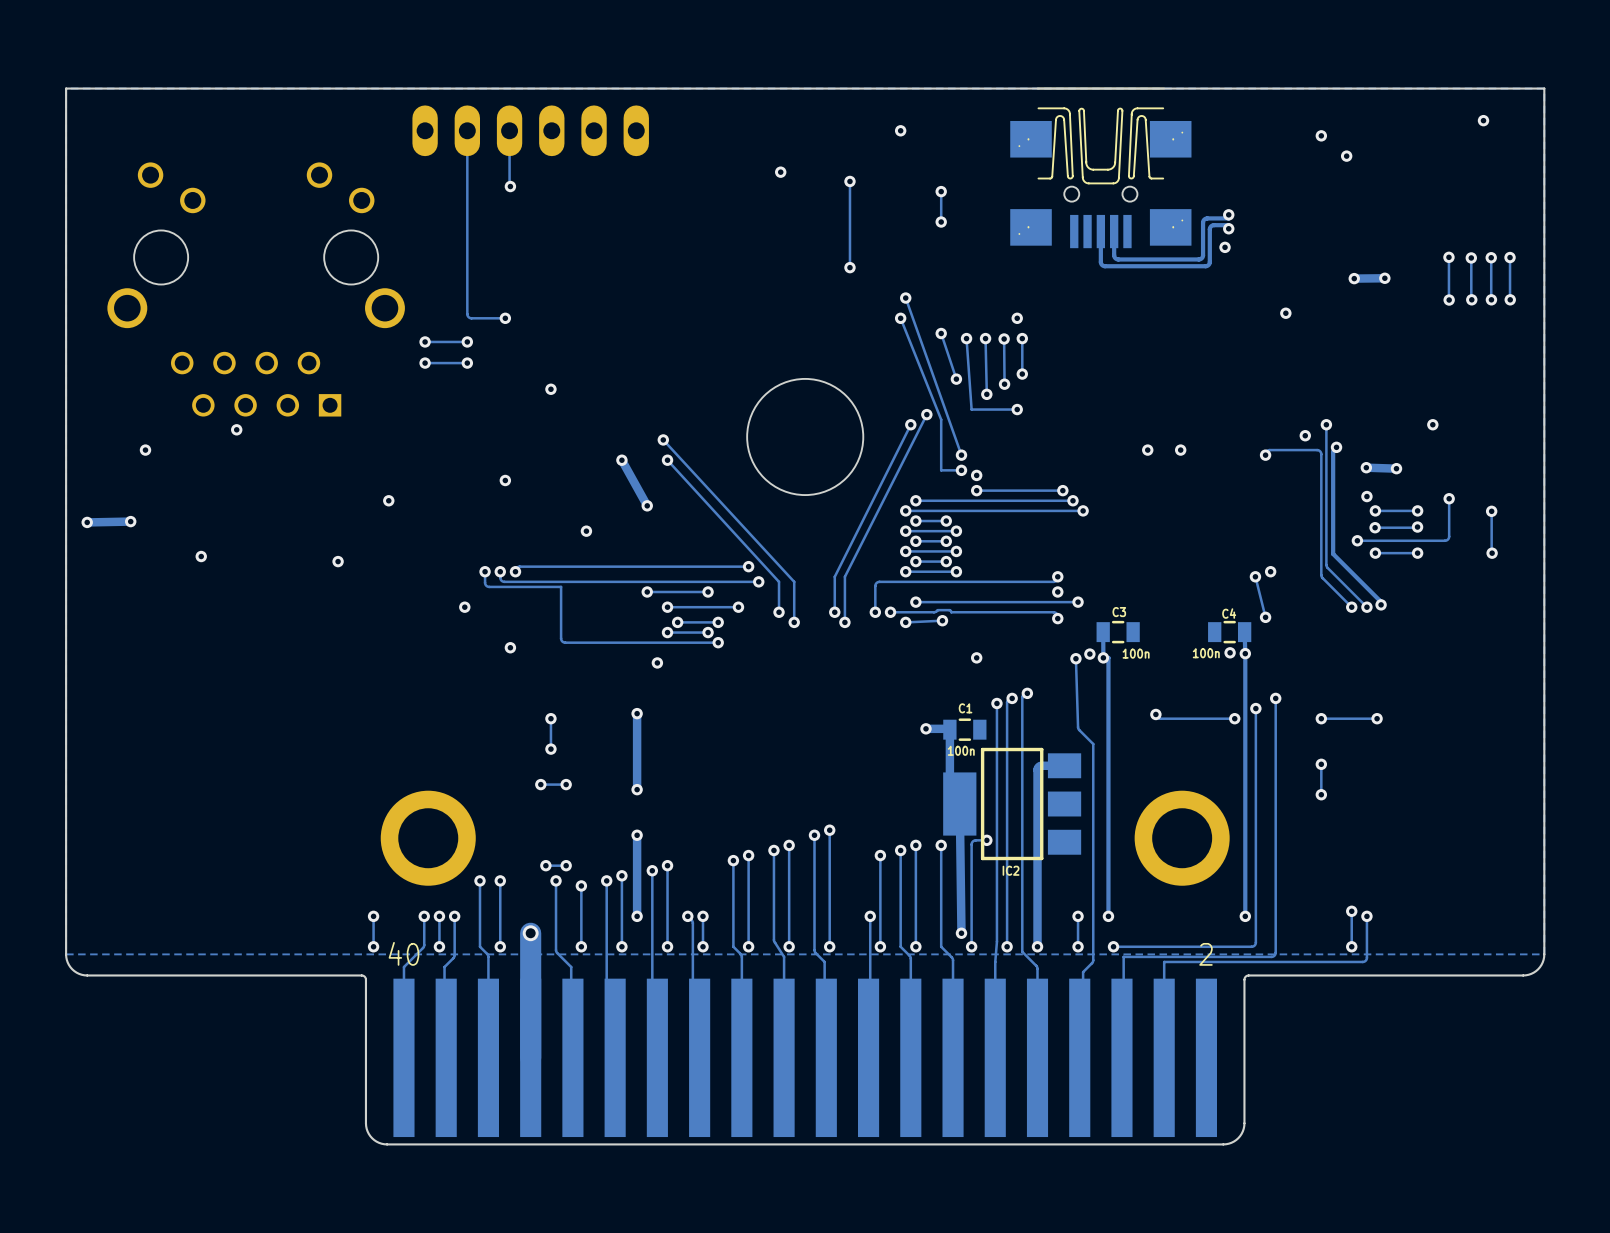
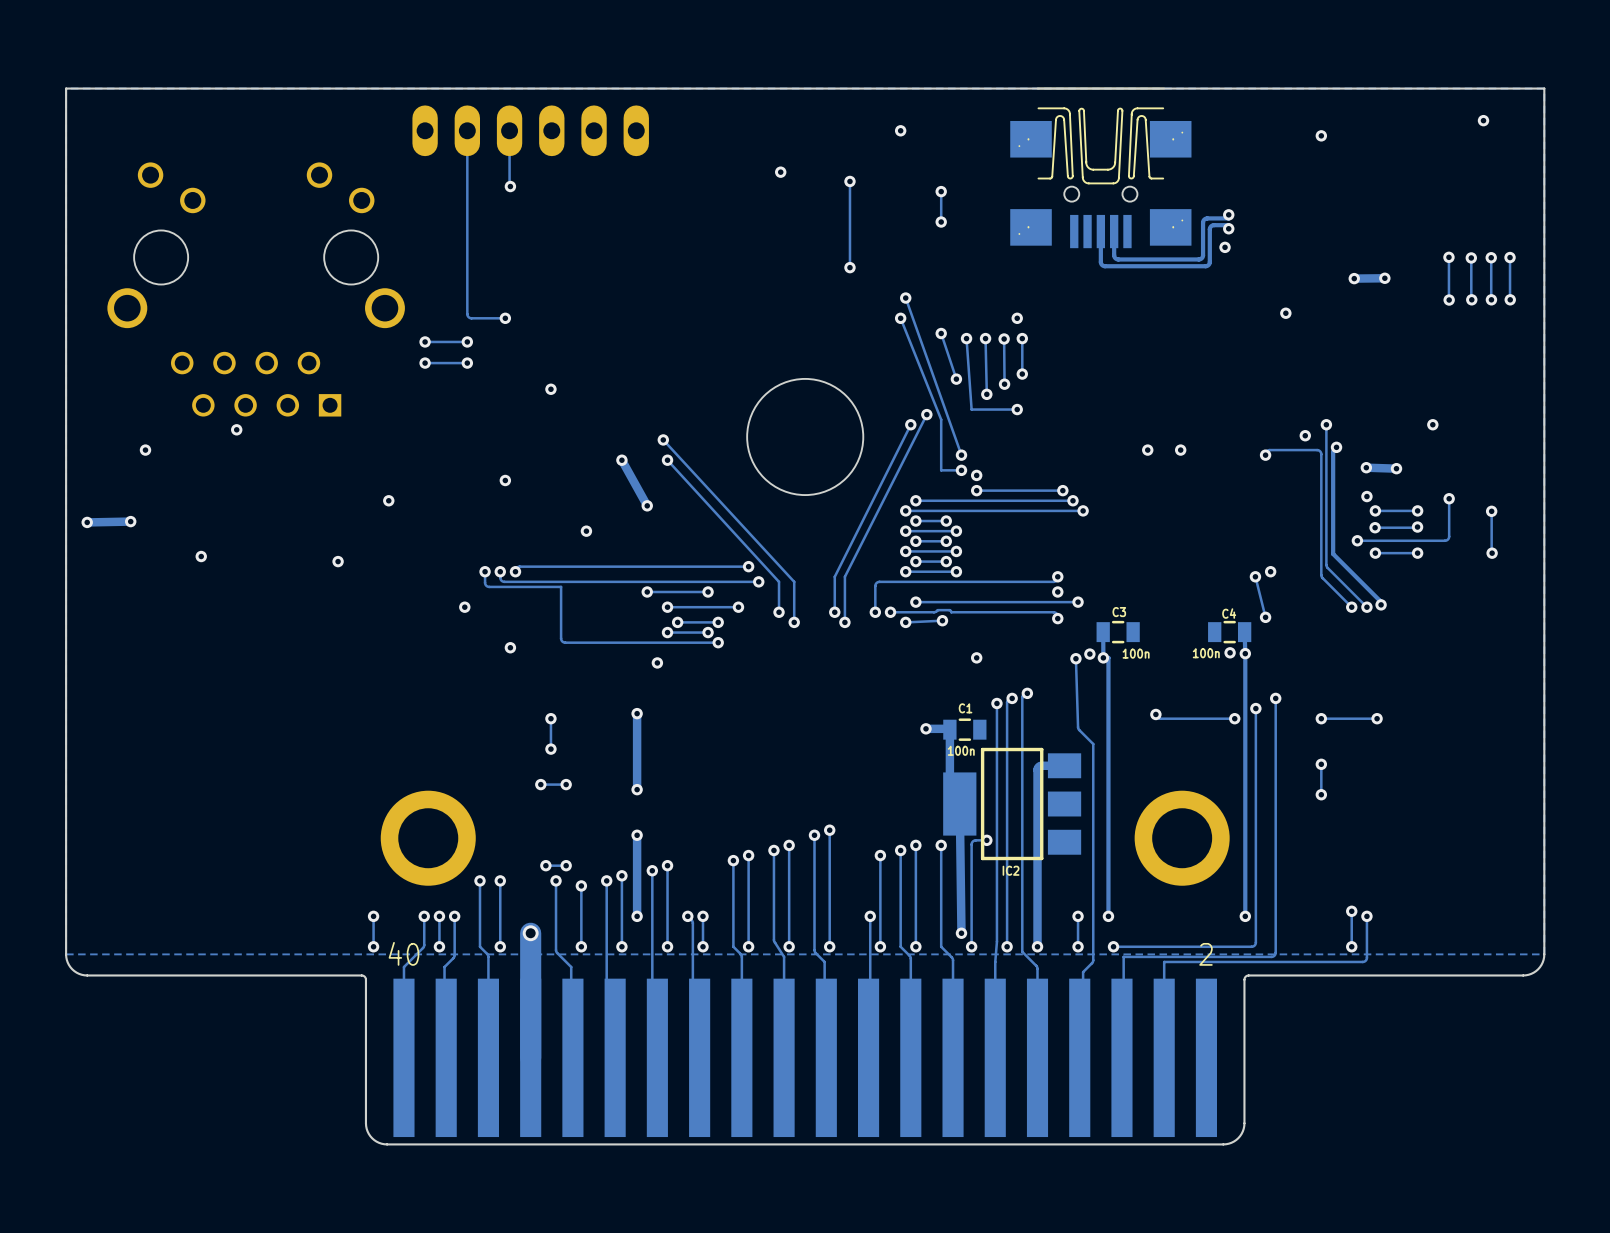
via: (1346, 156) -> none

